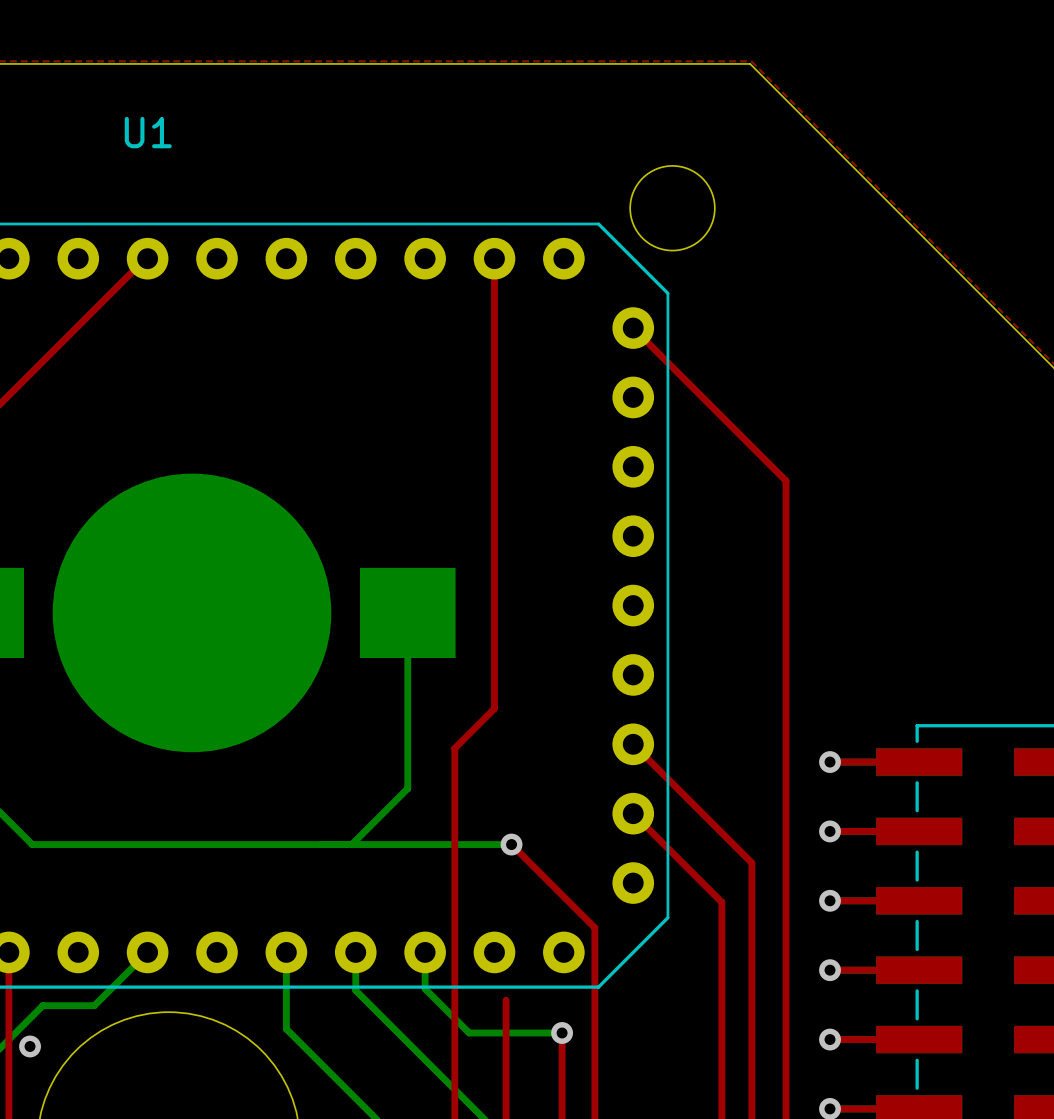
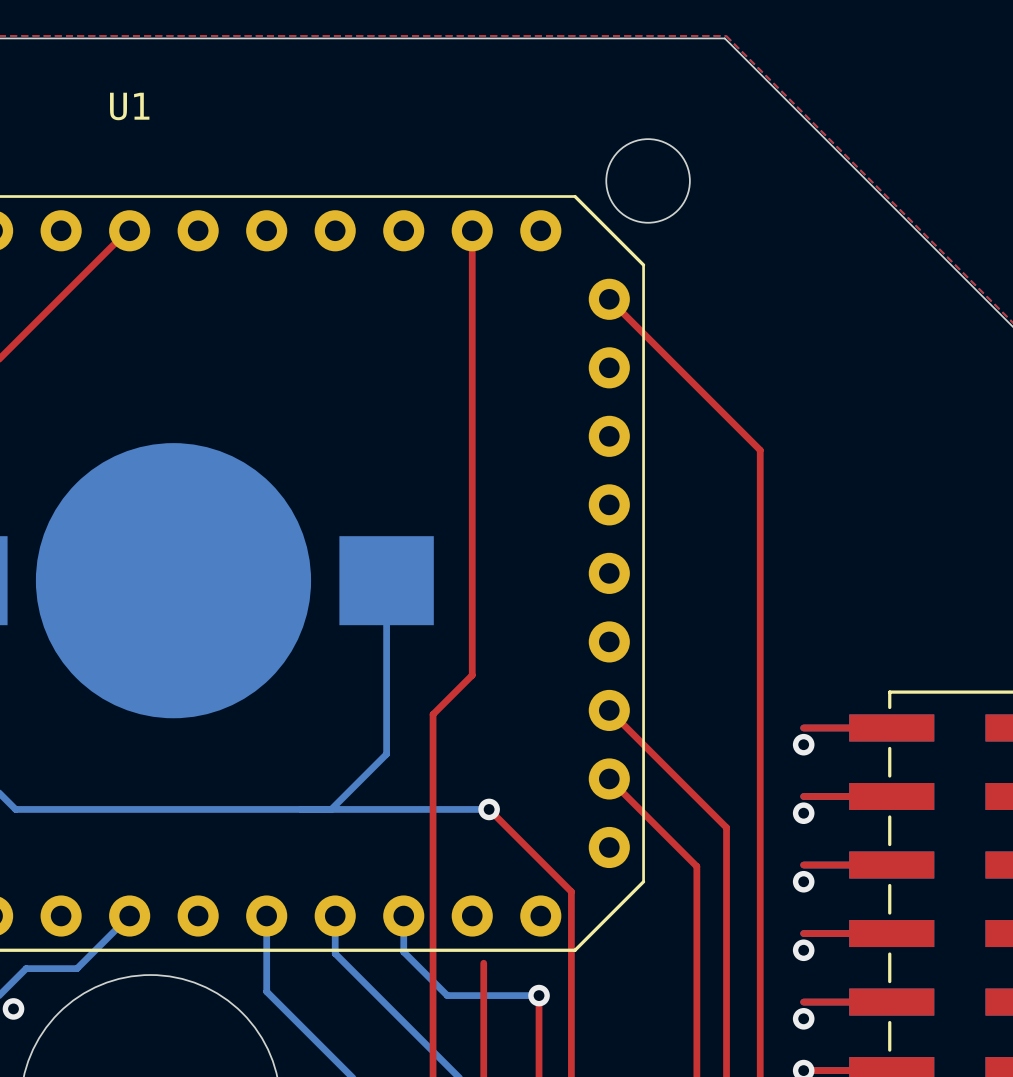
via position: (830, 762) -> (803, 744)
via position: (830, 831) -> (803, 813)
via position: (830, 900) -> (803, 881)
via position: (830, 970) -> (803, 950)
via position: (830, 1039) -> (803, 1018)

